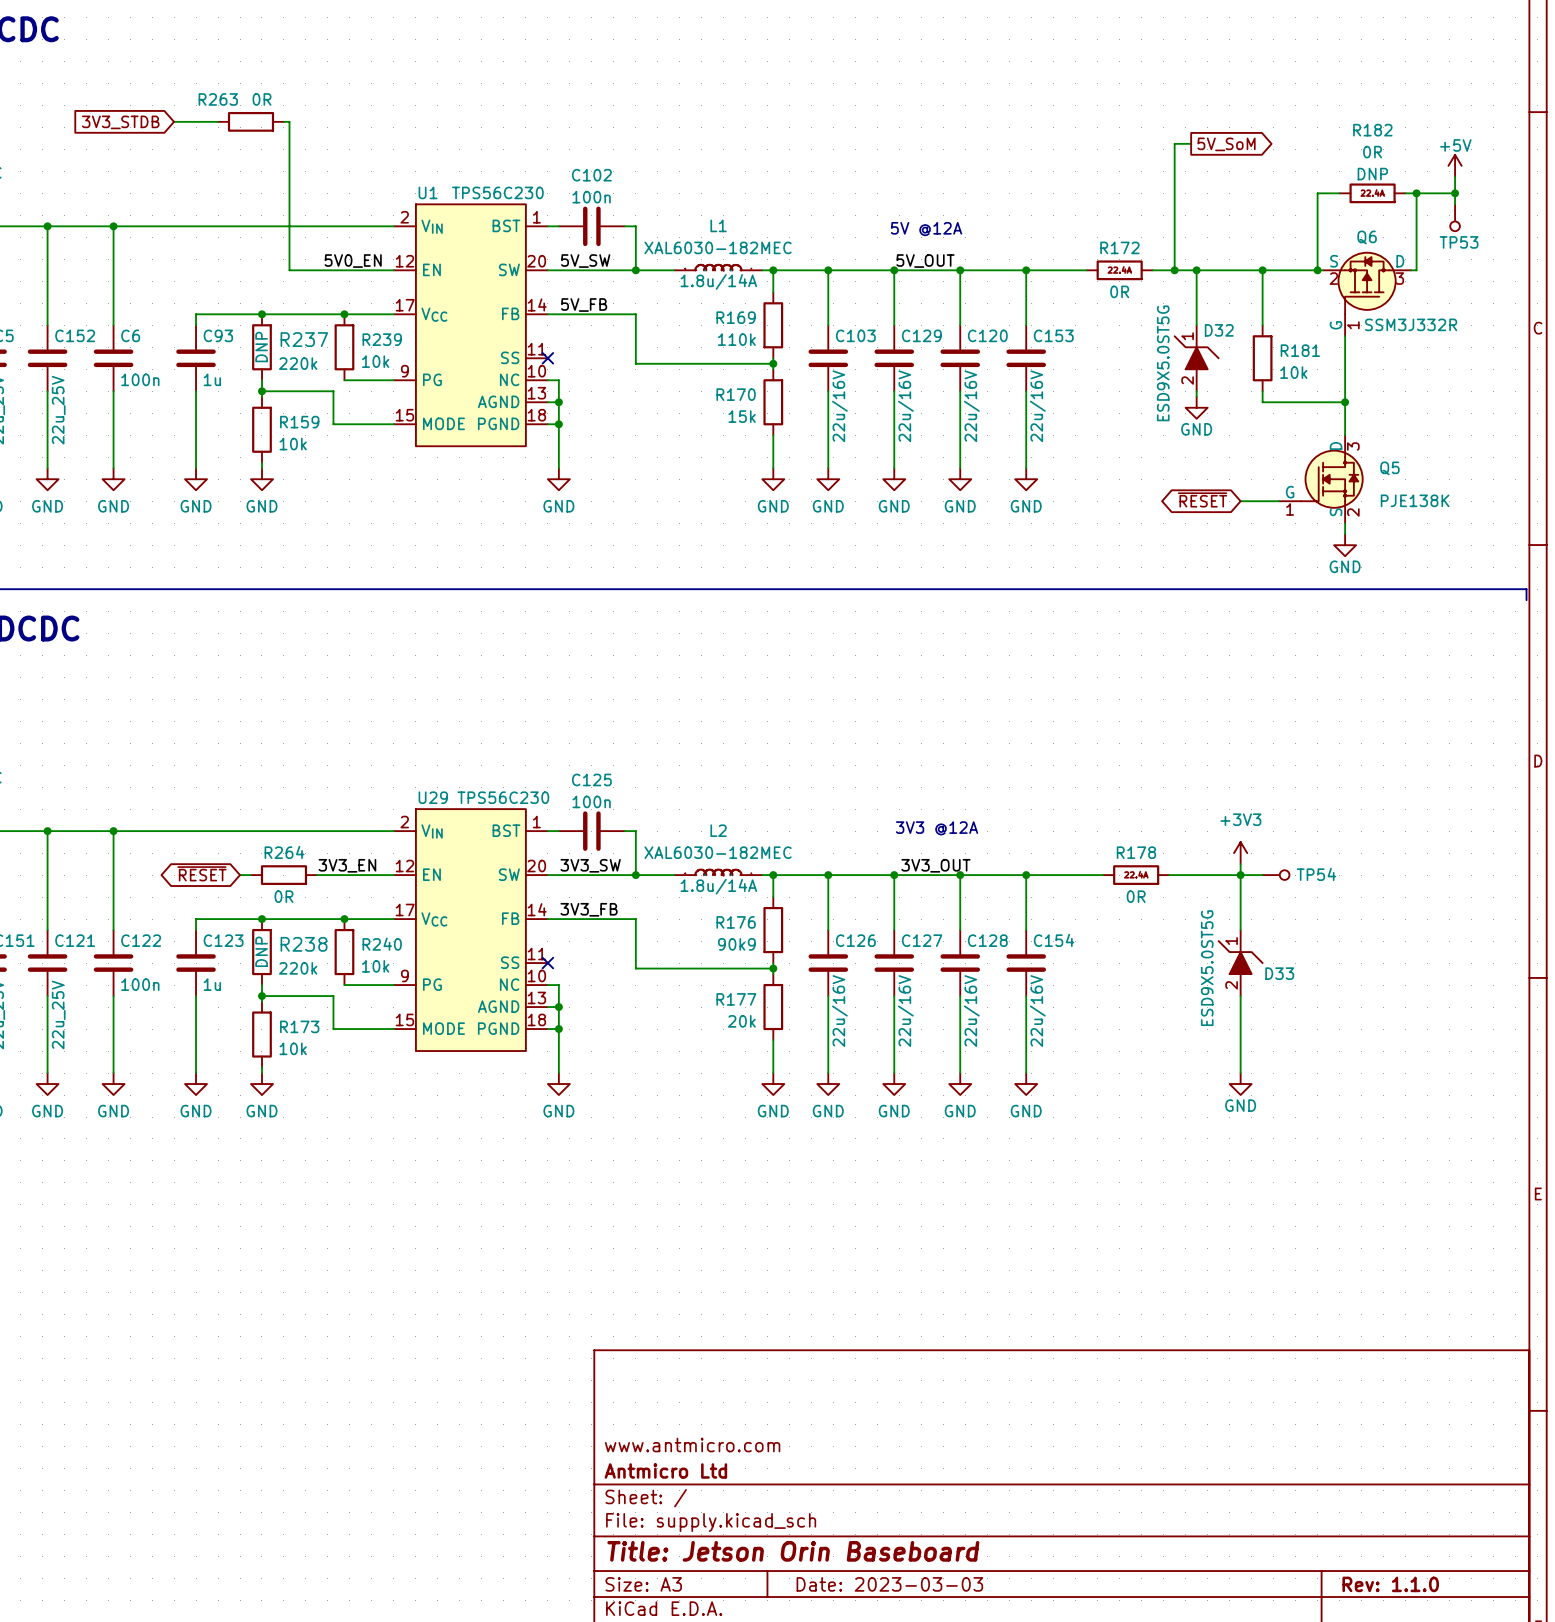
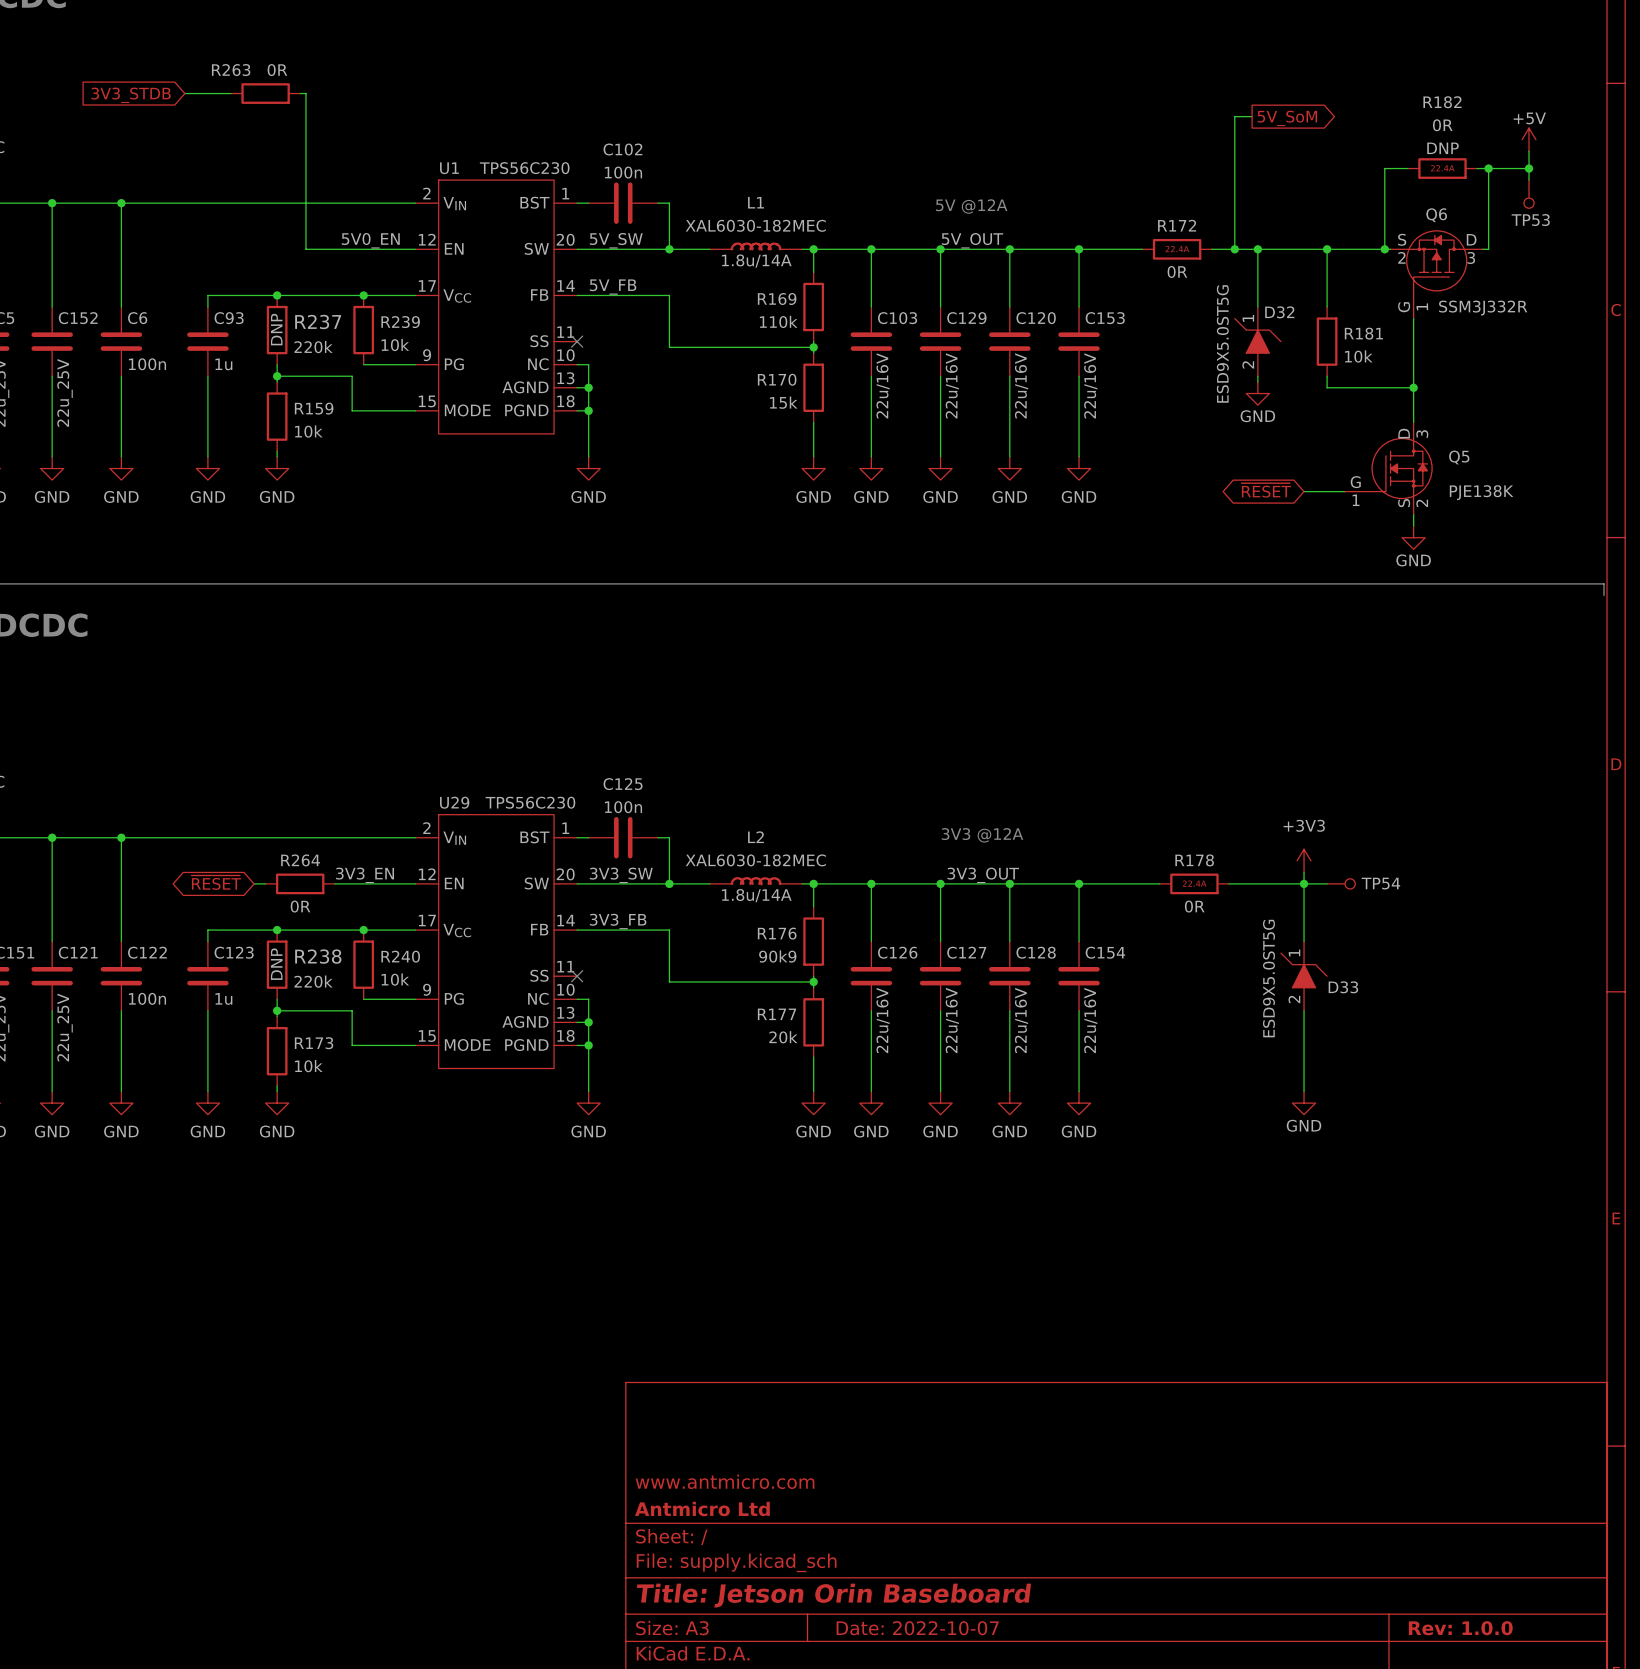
title block: Date: 2023-03-03 (889, 1584) -> Date: 2022-10-07 (917, 1628)
title block: Rev: 1.1.0 (1390, 1584) -> Rev: 1.0.0 (1460, 1628)

